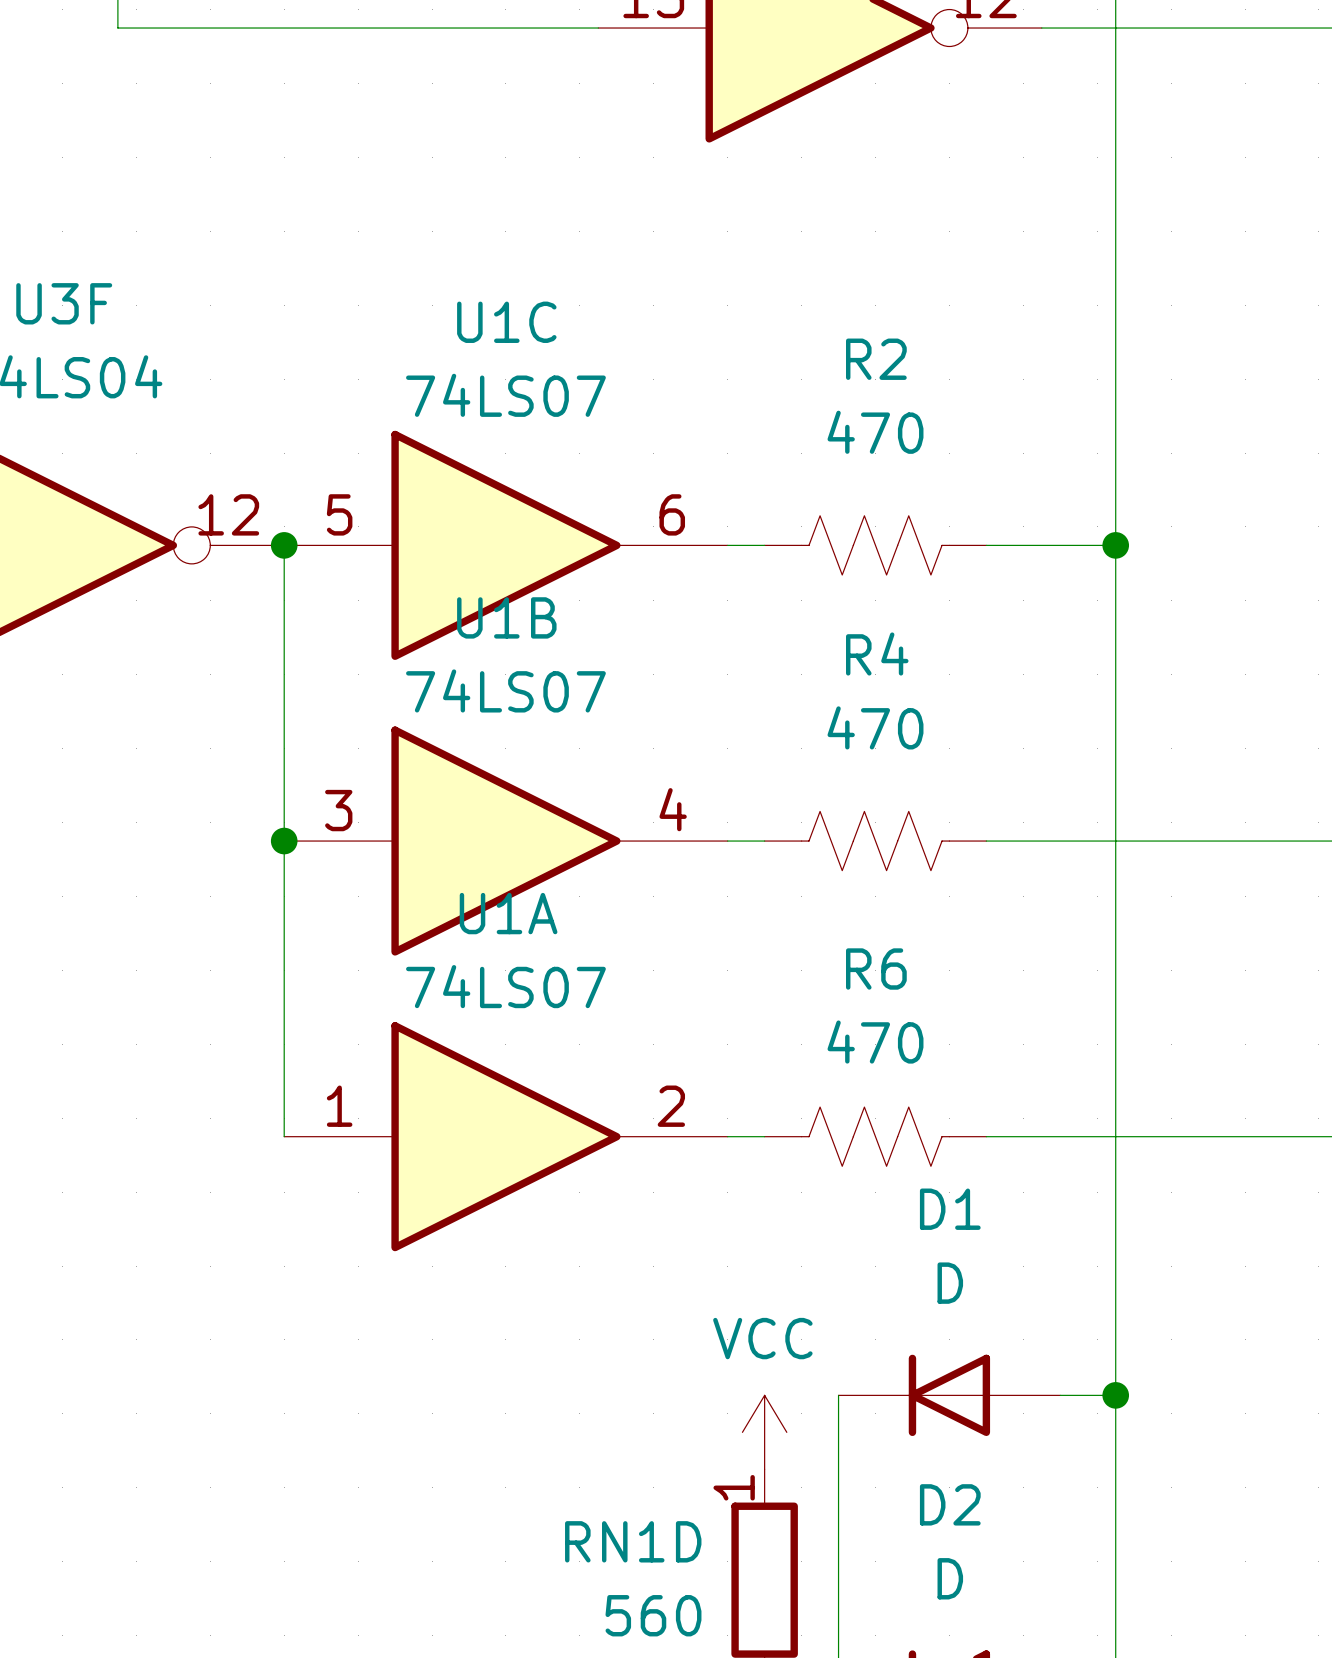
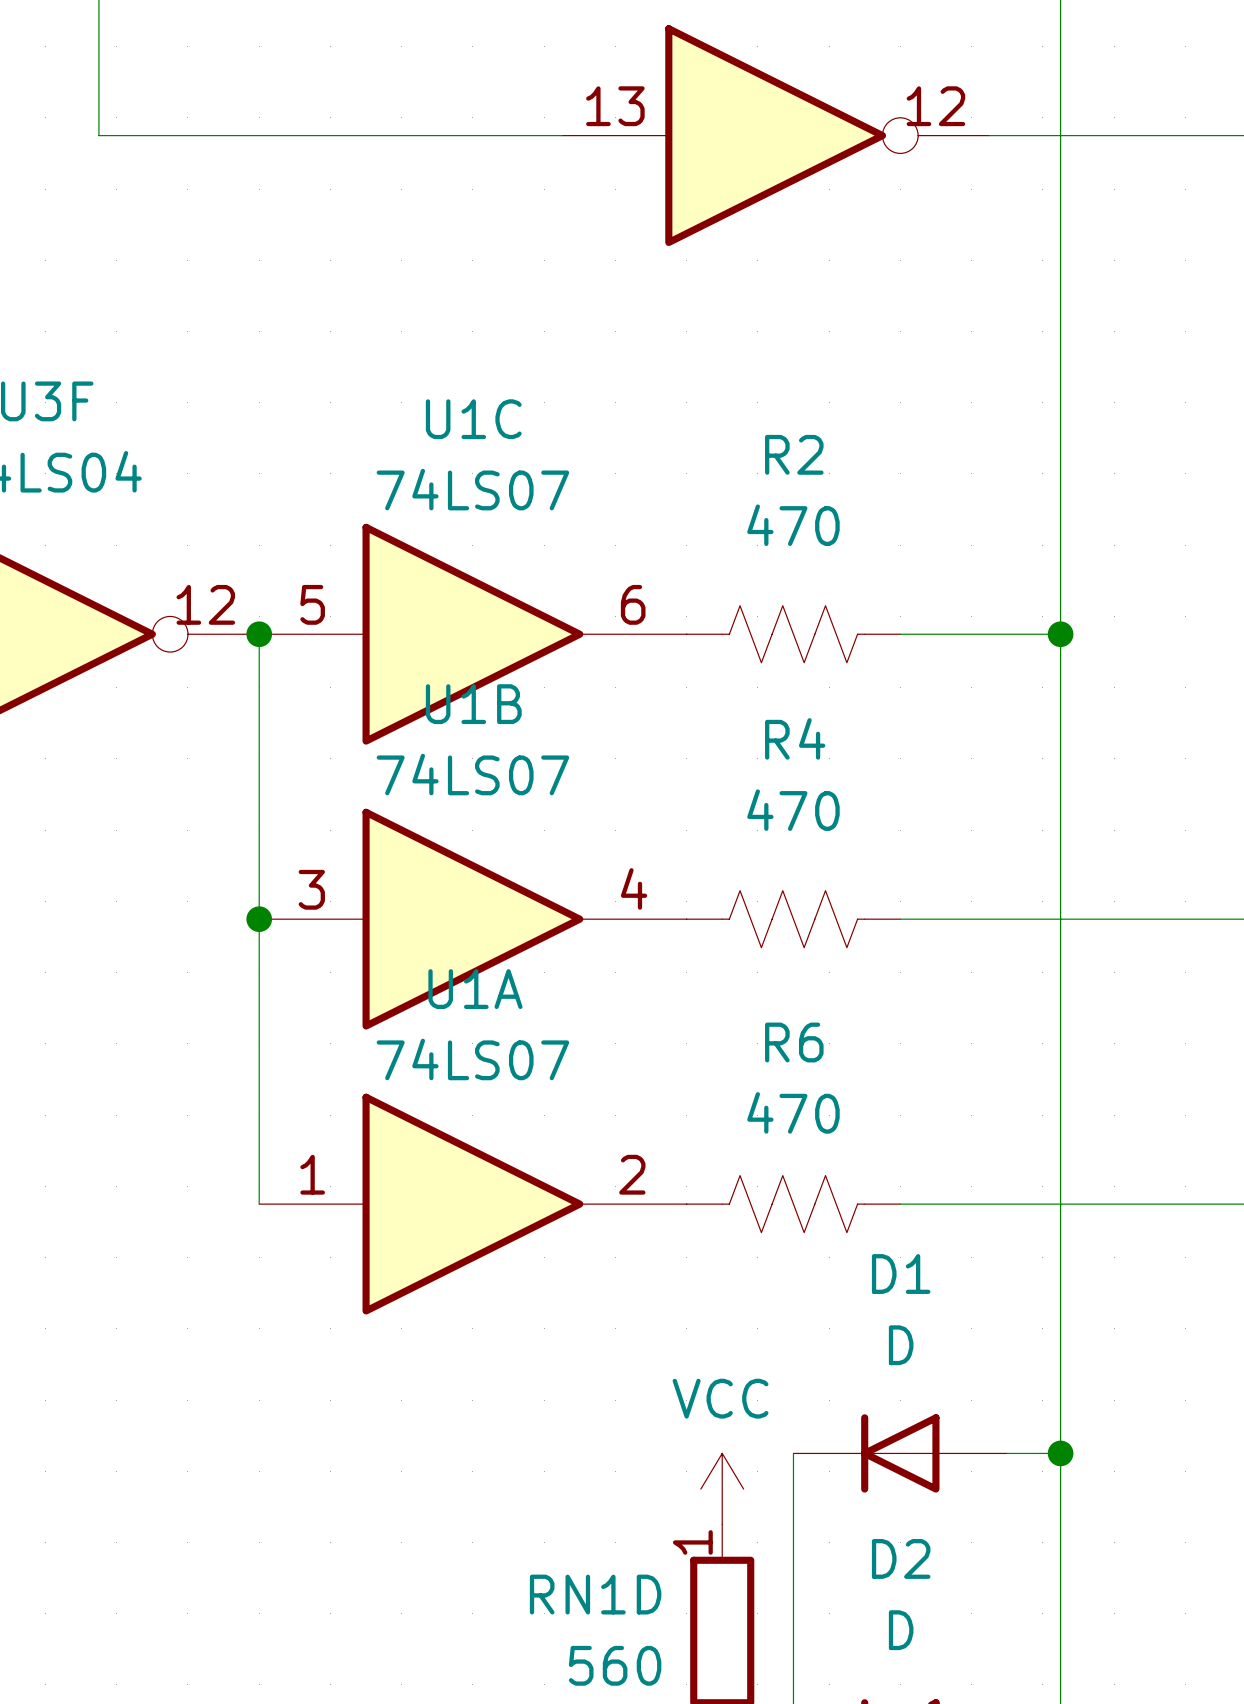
R2 position: (875, 545) -> (793, 634)
R4 position: (875, 841) -> (793, 919)
R6 position: (875, 1136) -> (793, 1204)

